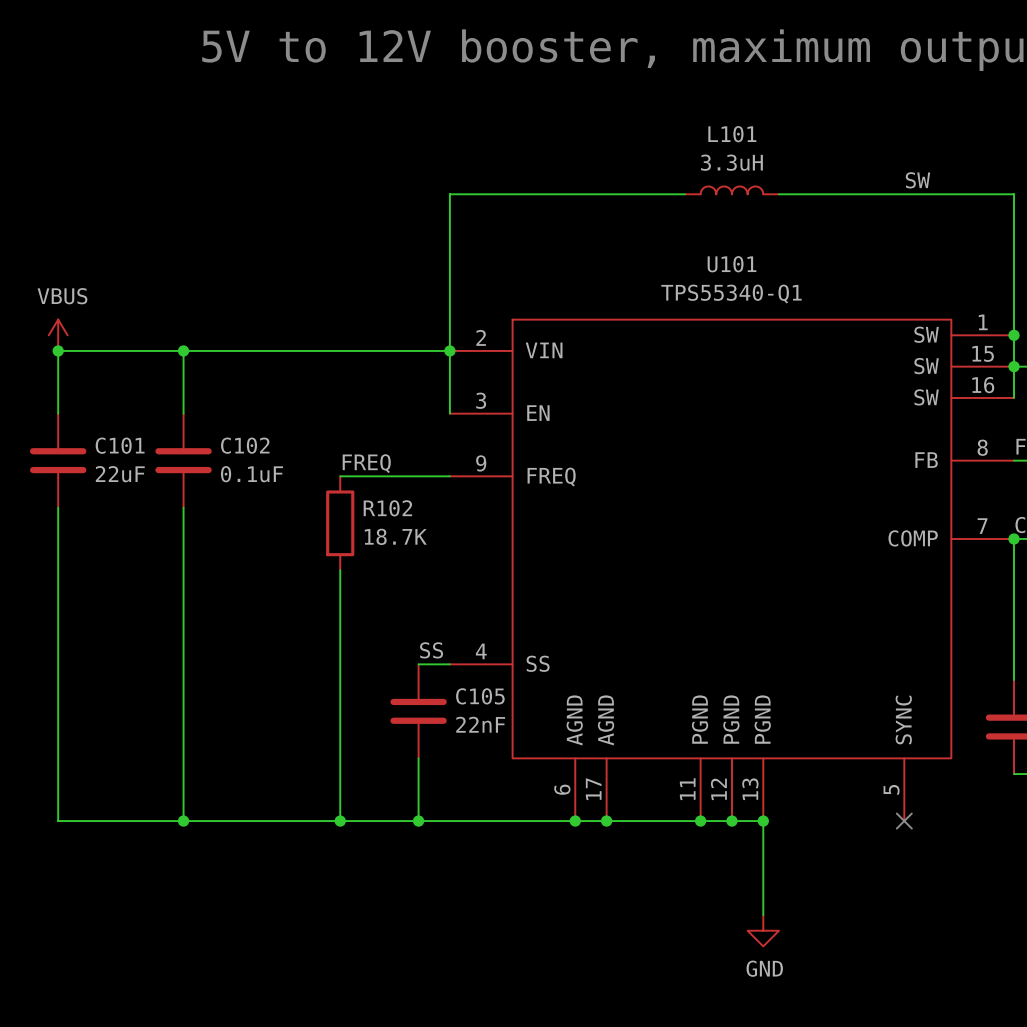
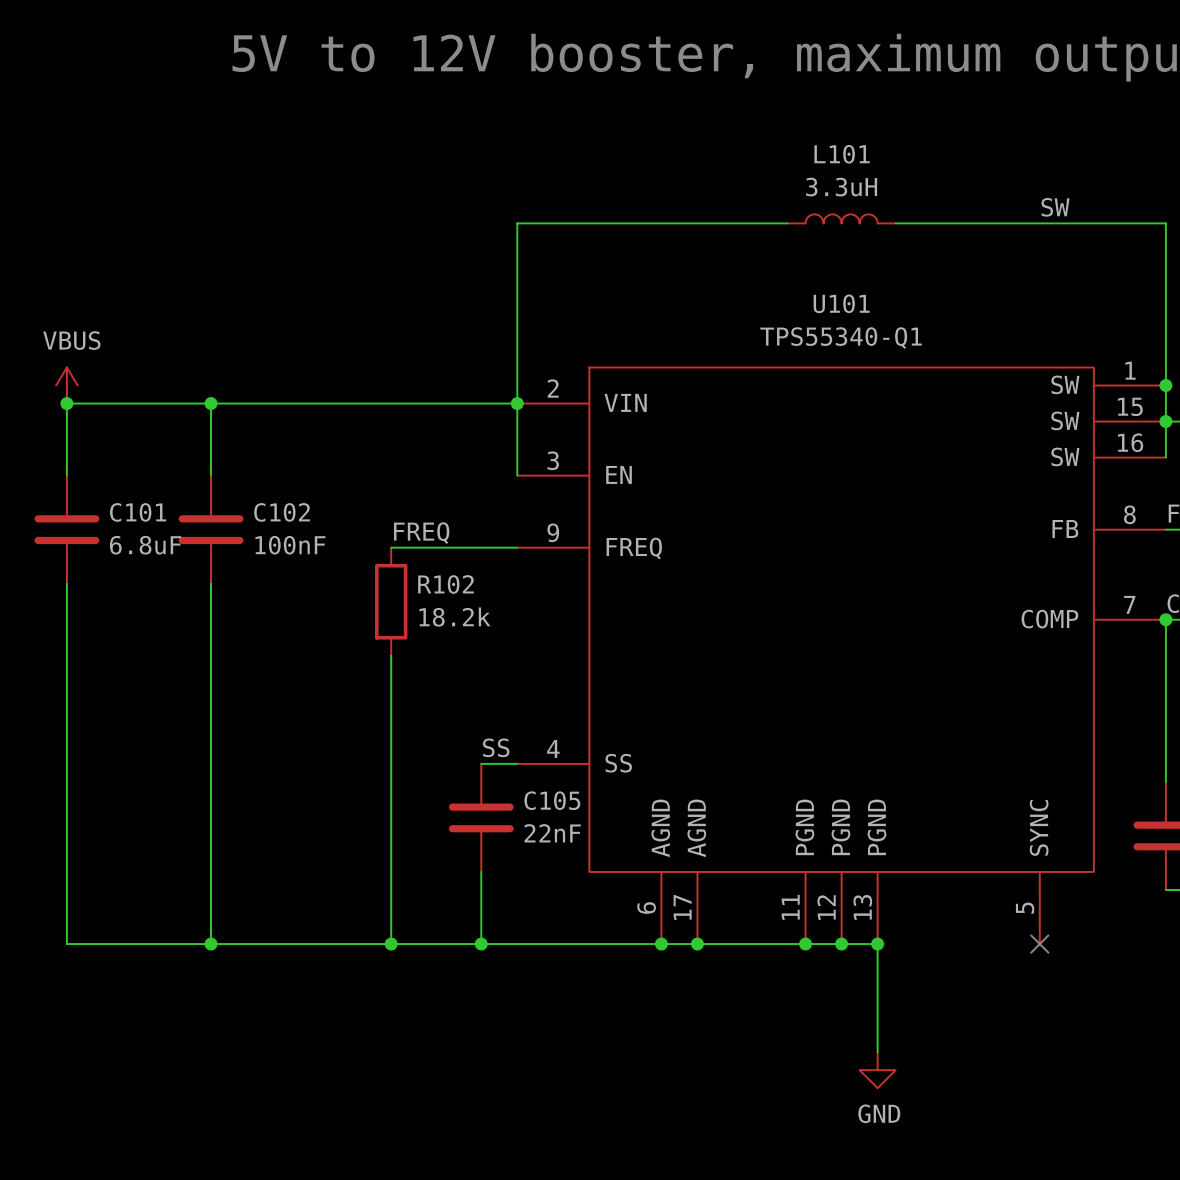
C101 value: 22uF (120, 474) -> 6.8uF (145, 545)
C102 value: 0.1uF (252, 474) -> 100nF (290, 545)
R102 value: 18.7K (395, 536) -> 18.2k (454, 617)

